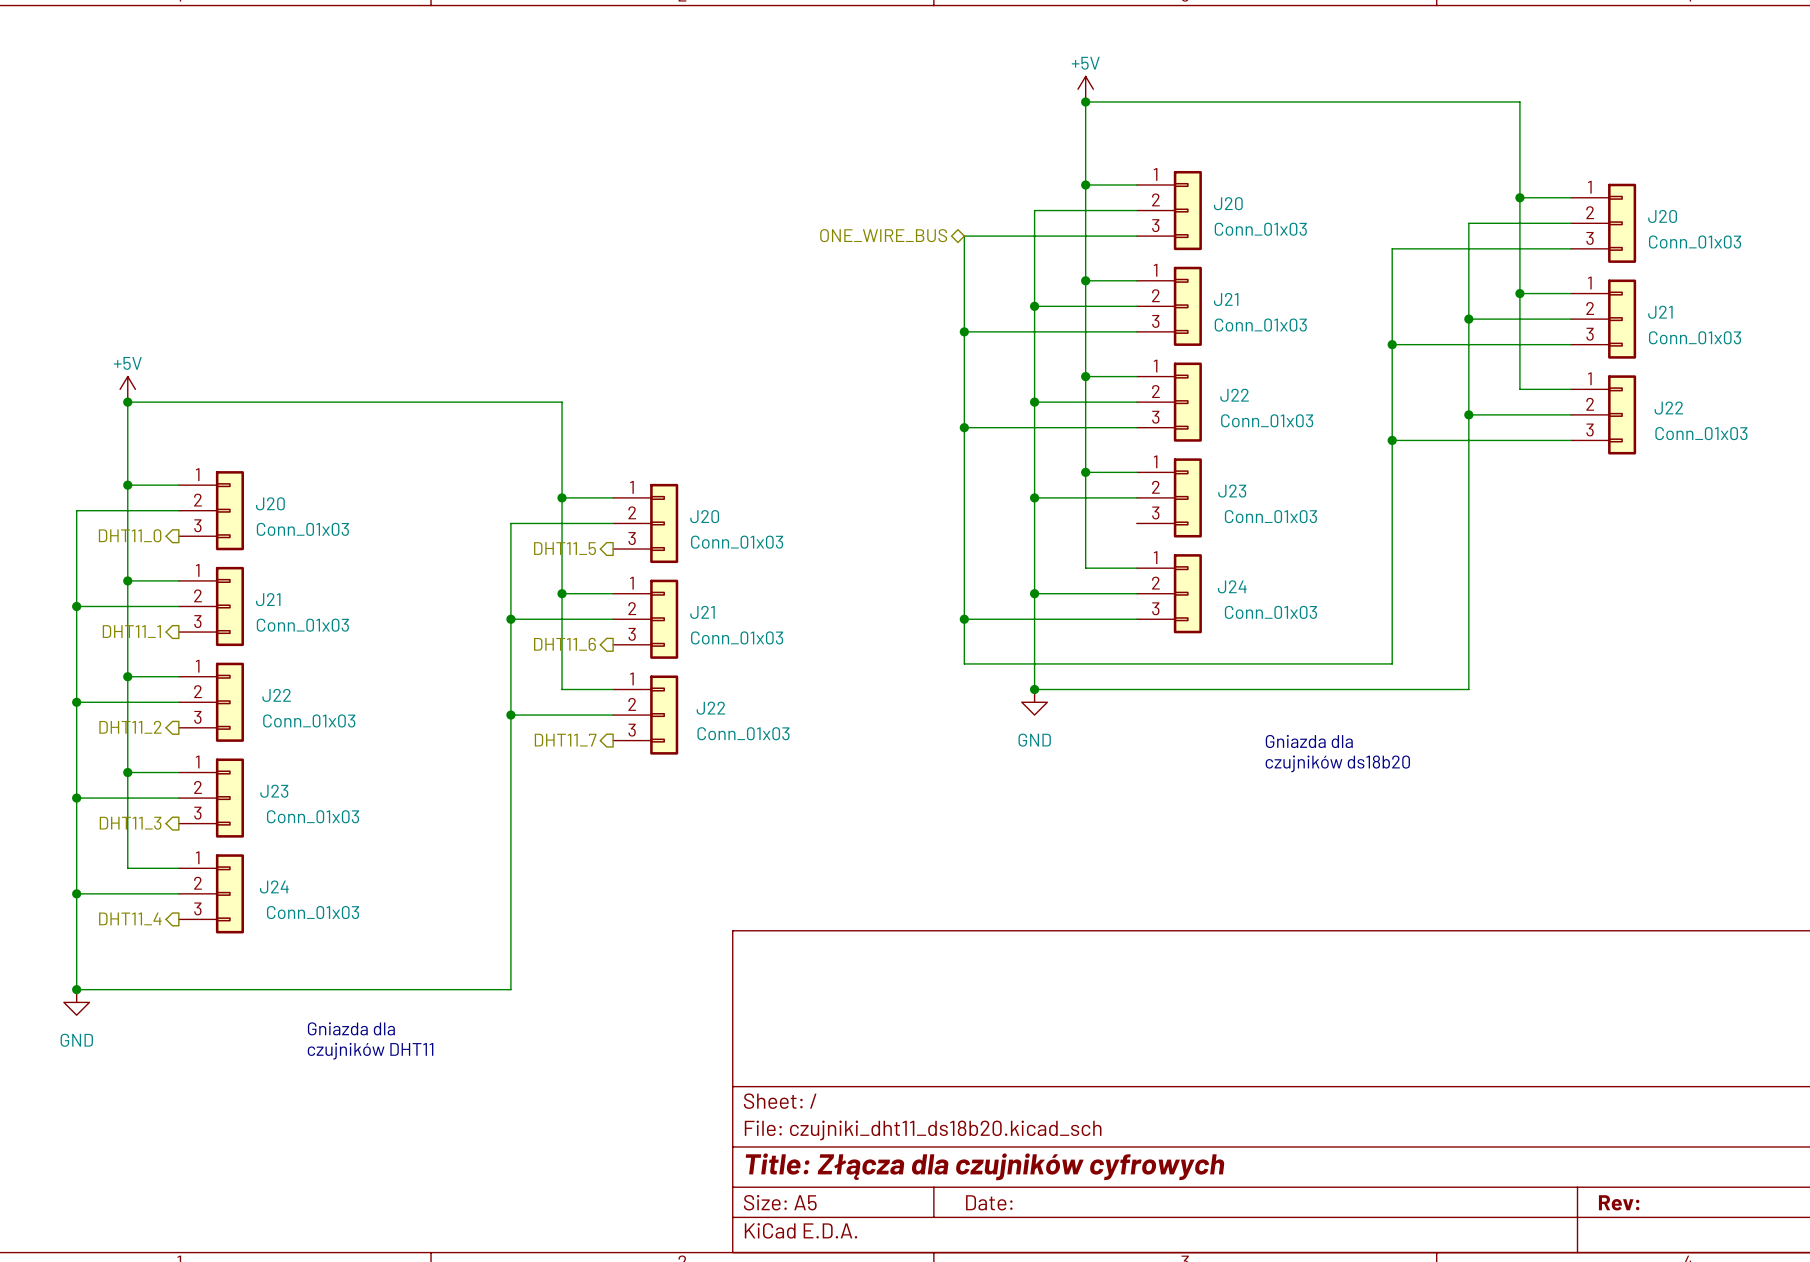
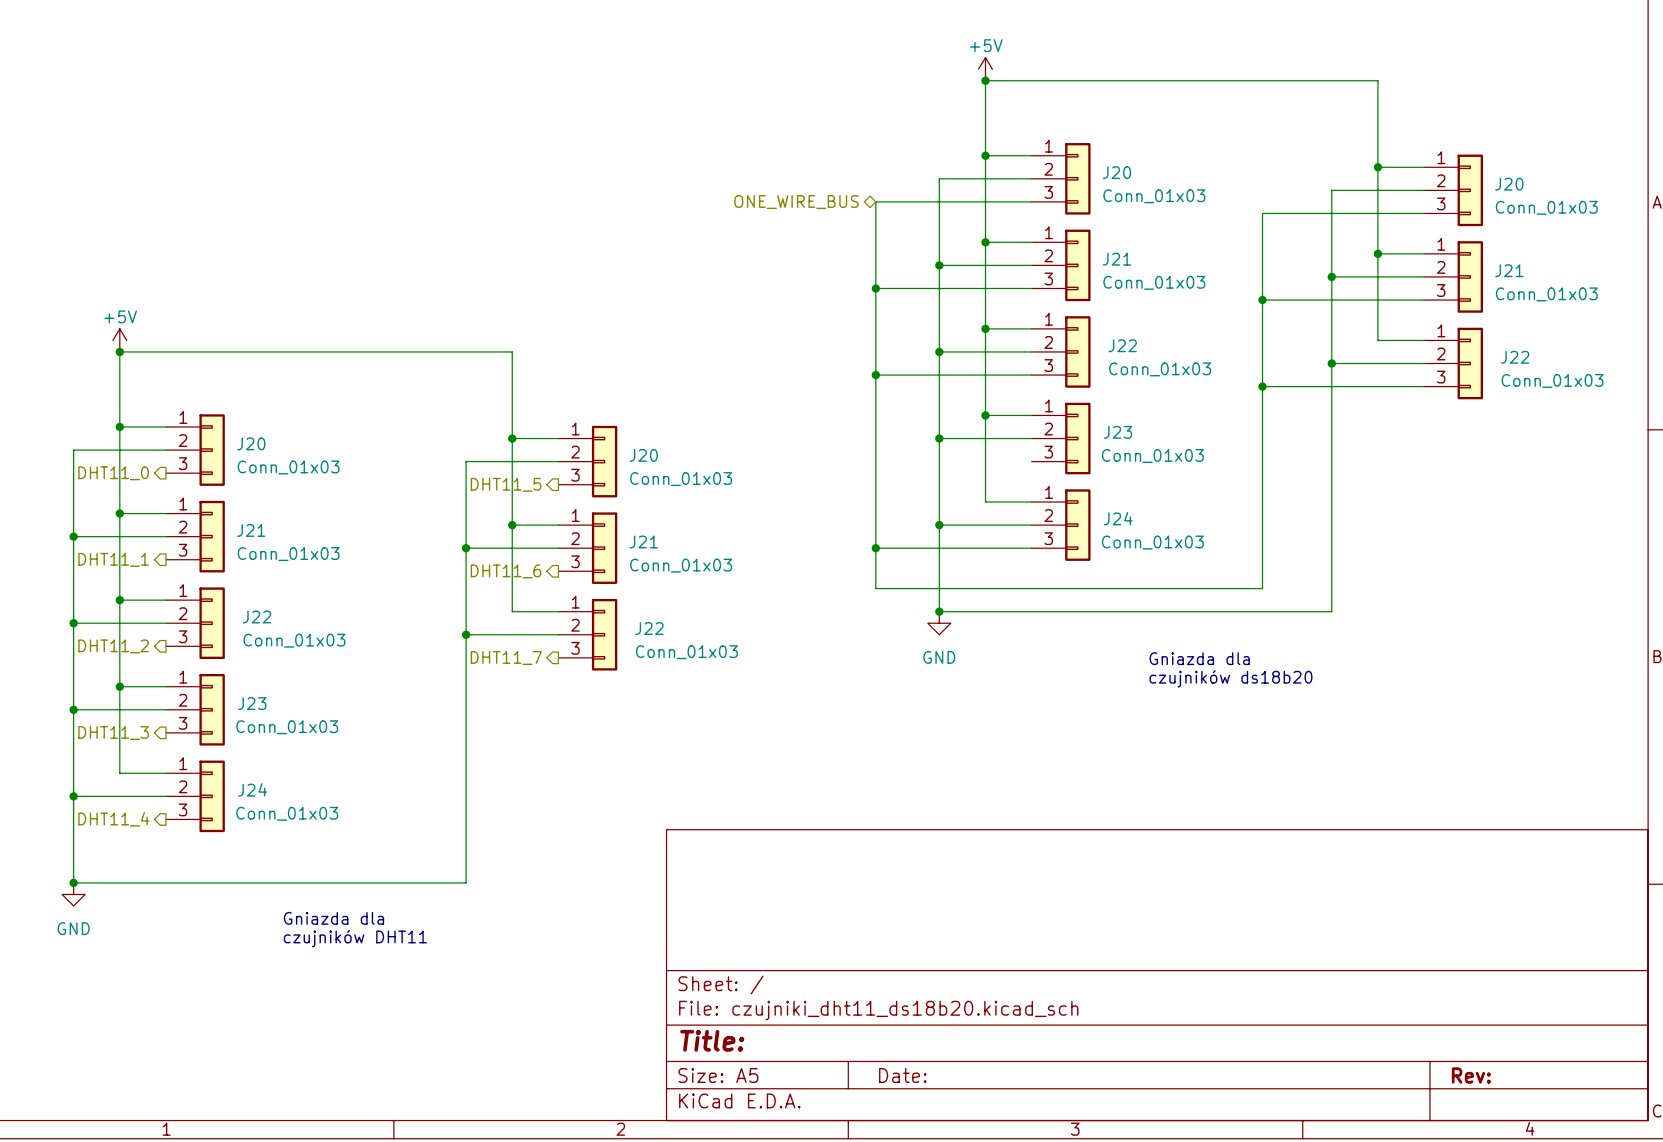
title block: Title: Złącza dla czujników cyfrowych (985, 1166) -> Title: (712, 1040)

